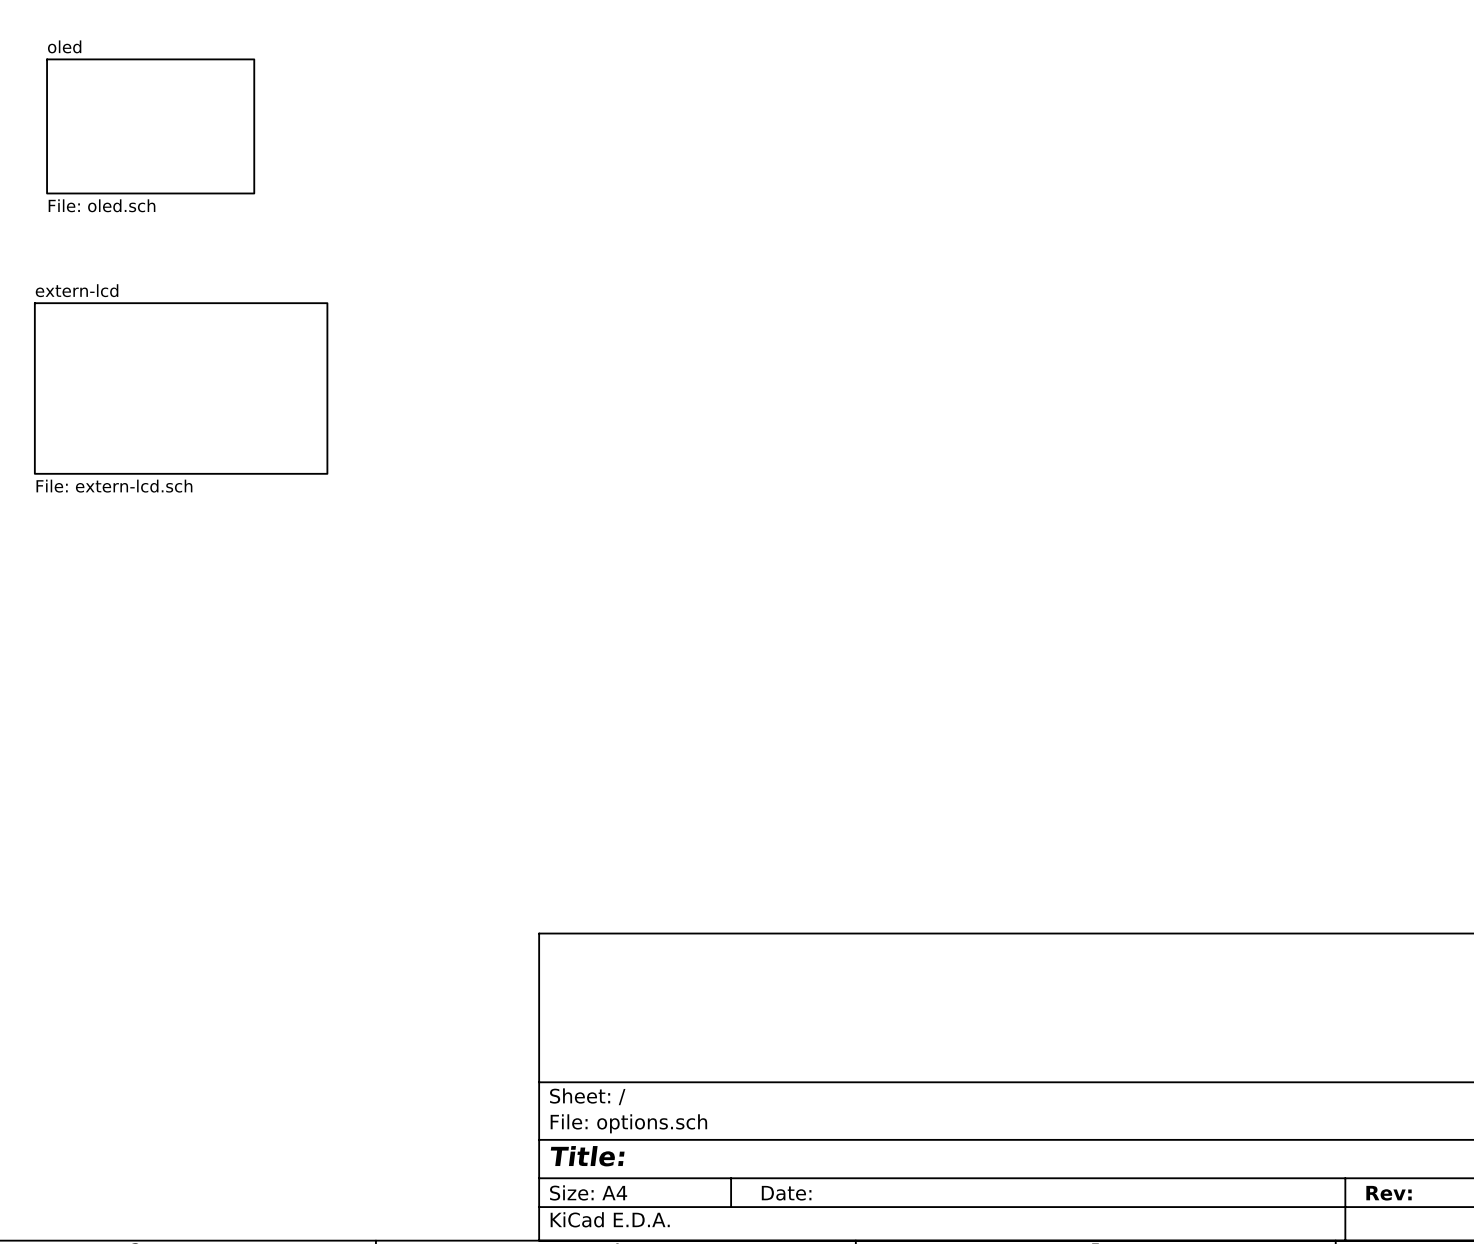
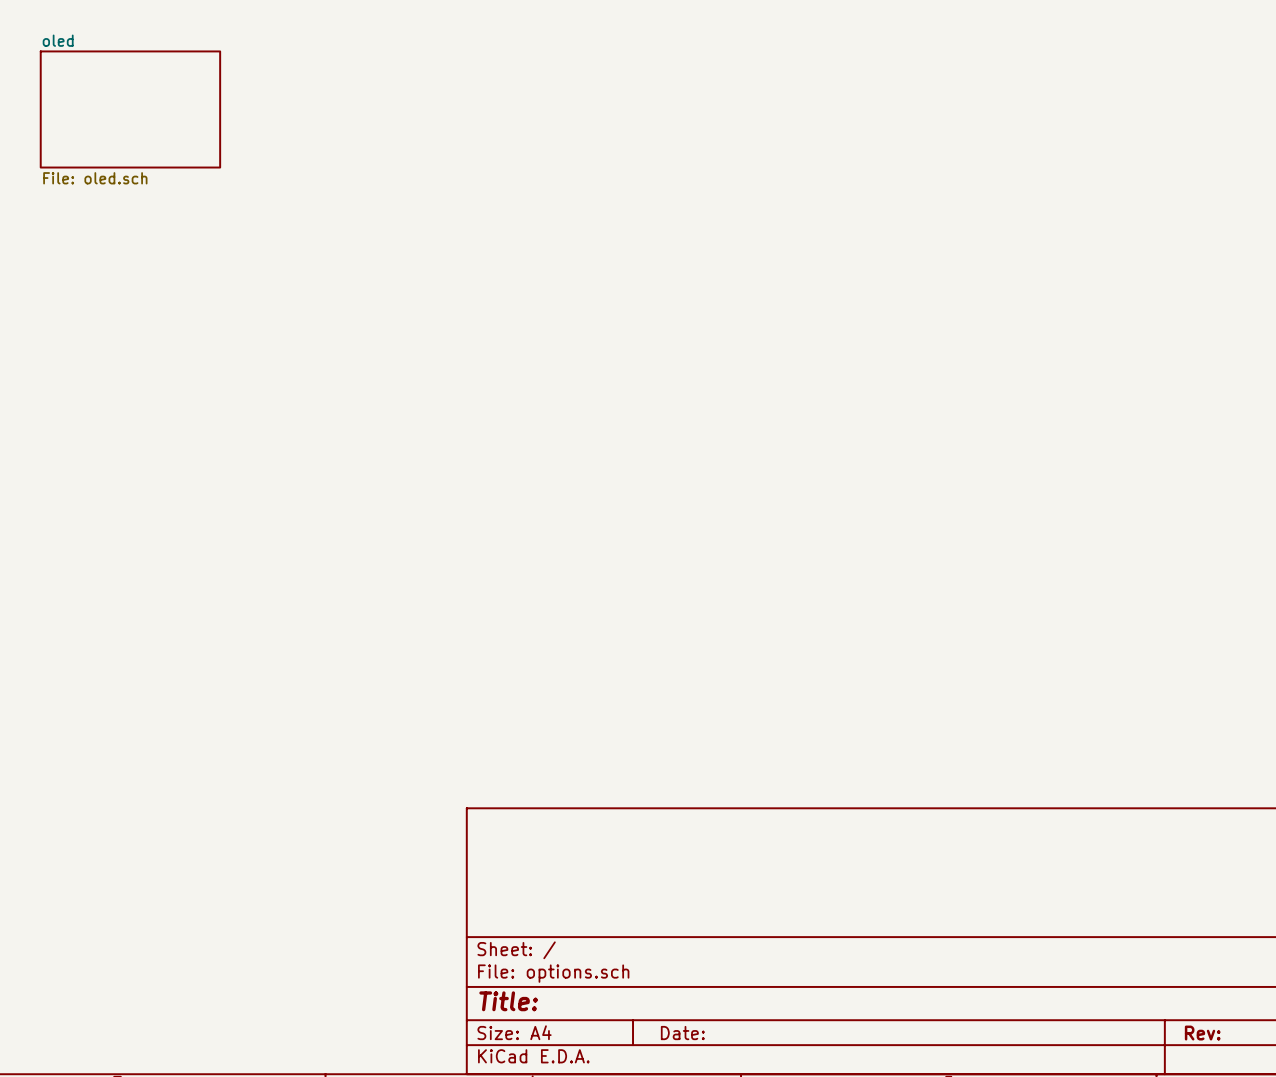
sheet extern-lcd: File: extern-lcd.sch (181, 388) -> none

